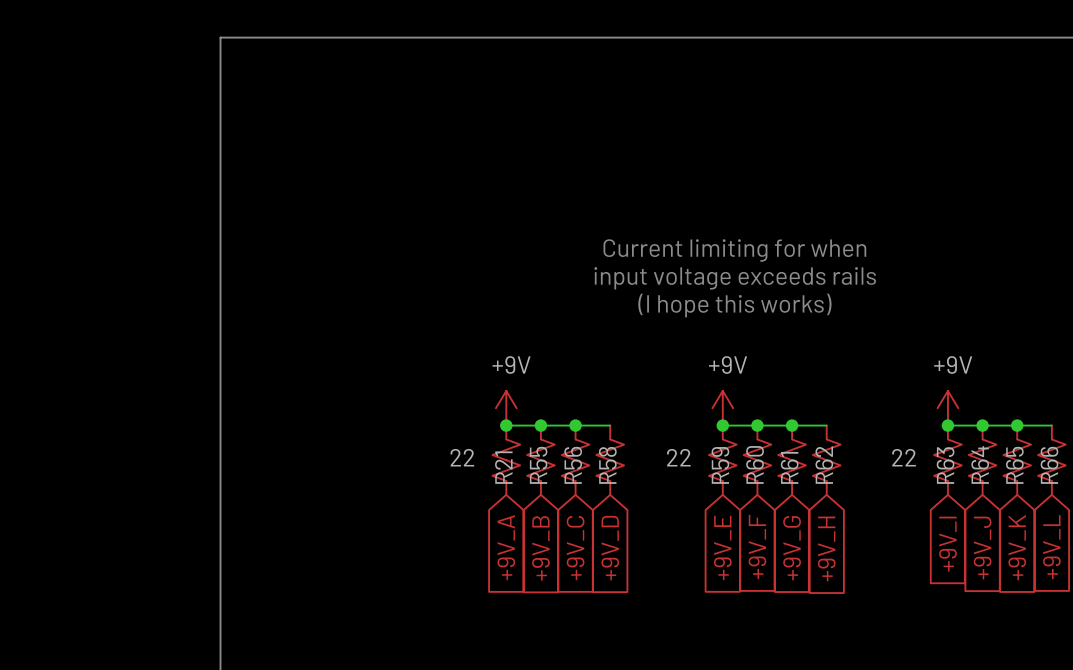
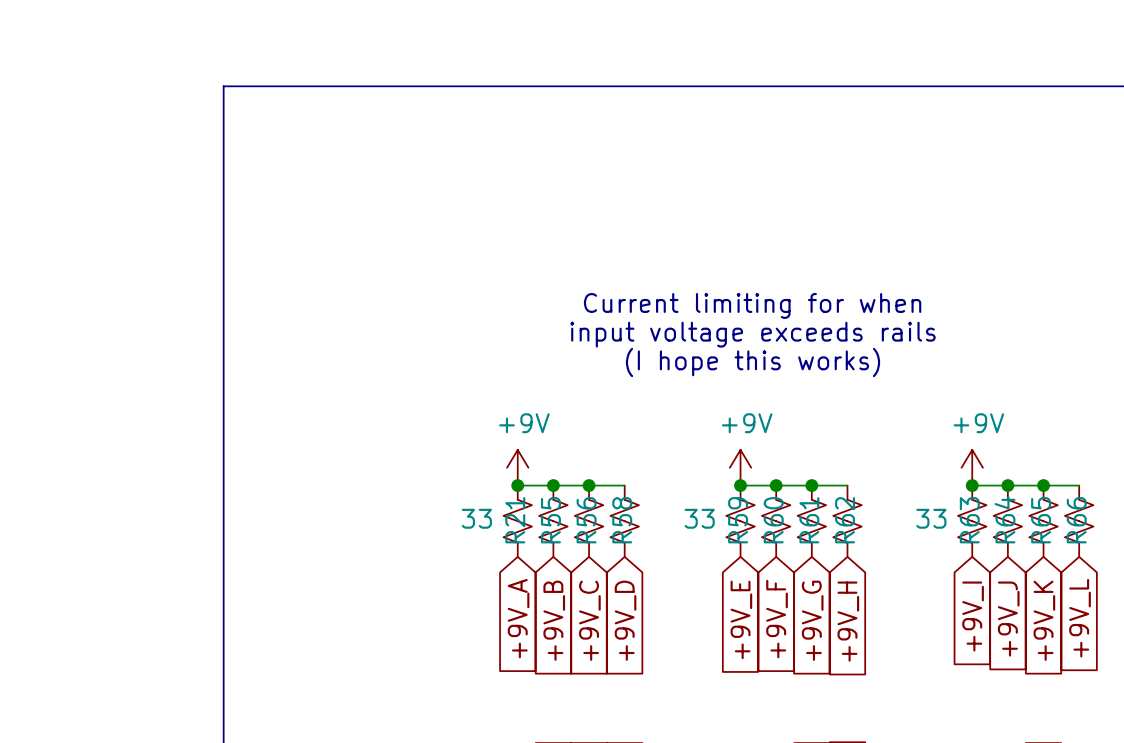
R21 value: 22 (462, 457) -> 33 (476, 518)
R59 value: 22 (678, 457) -> 33 (699, 518)
R63 value: 22 (904, 457) -> 33 (931, 518)

